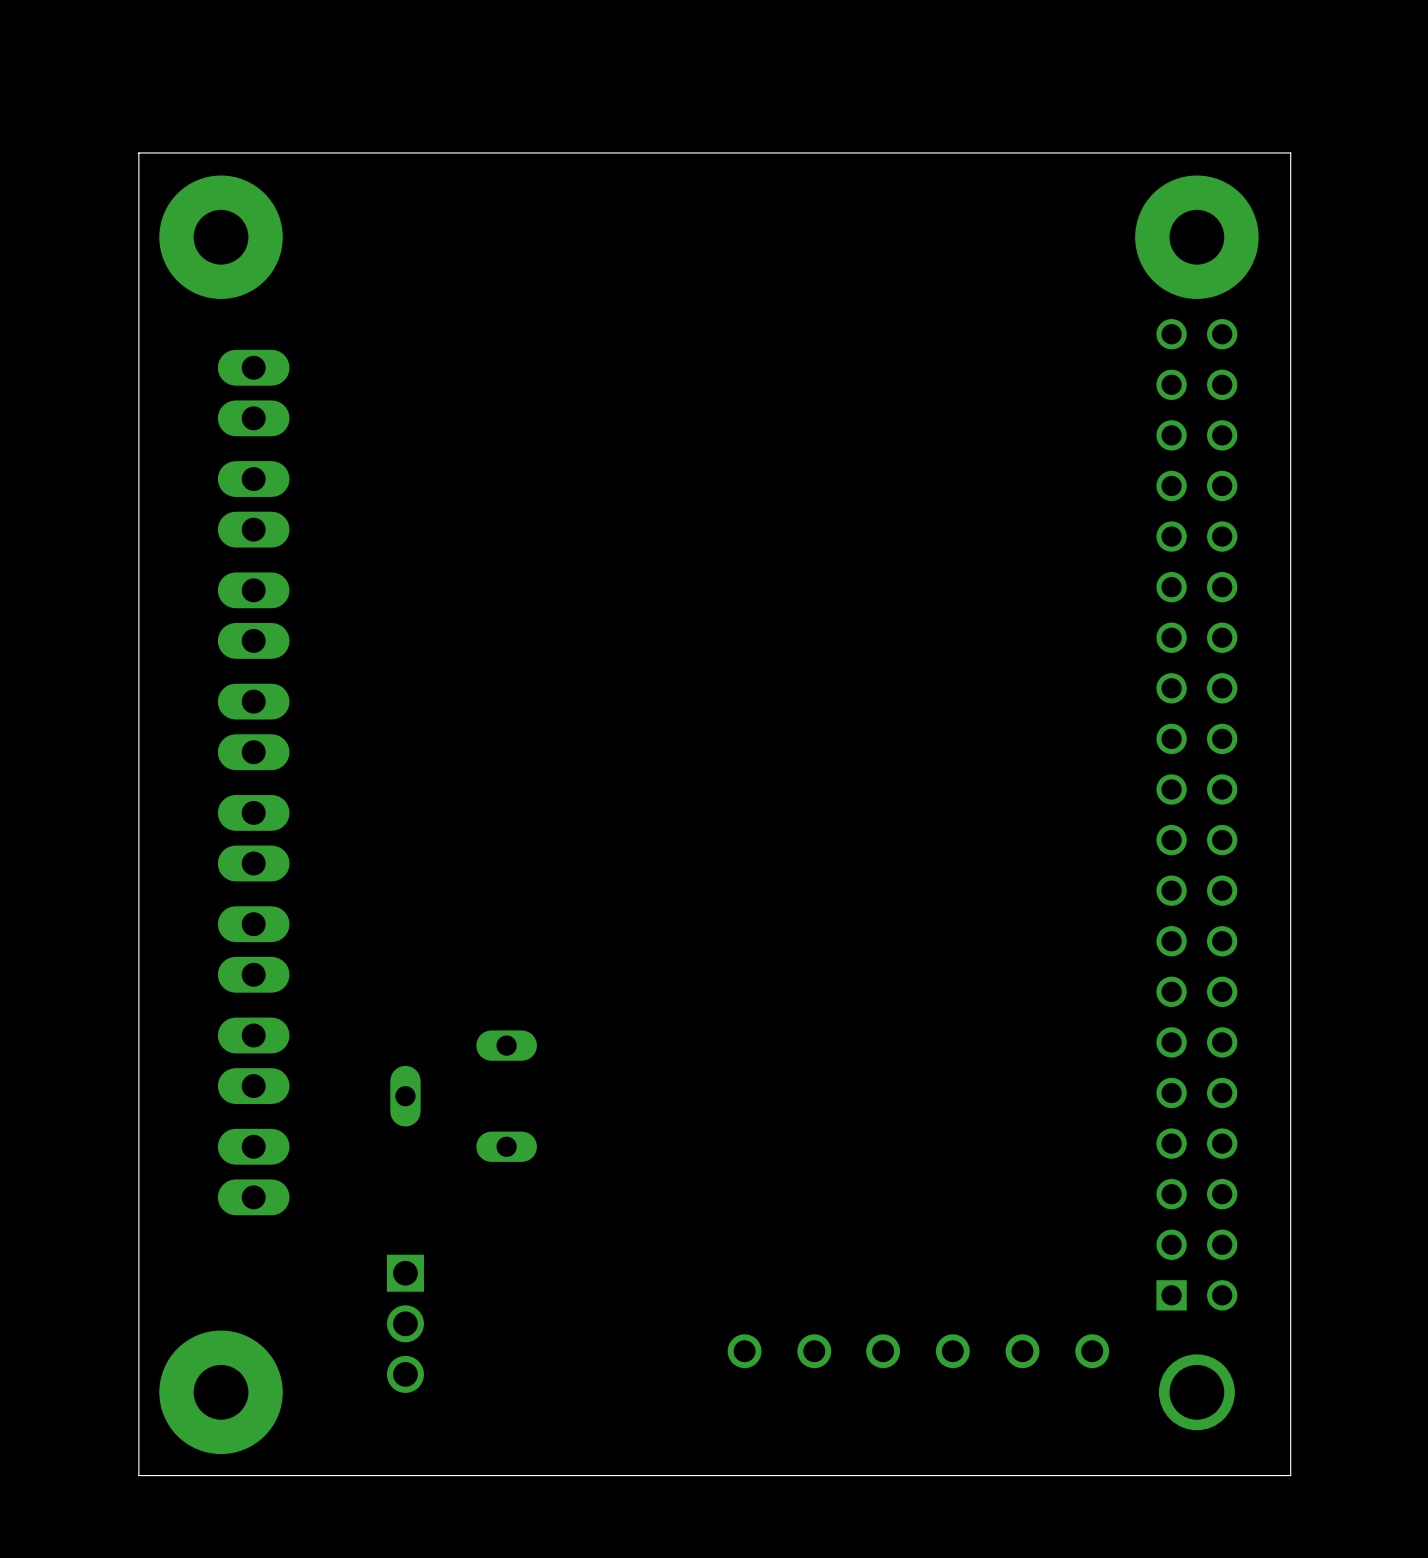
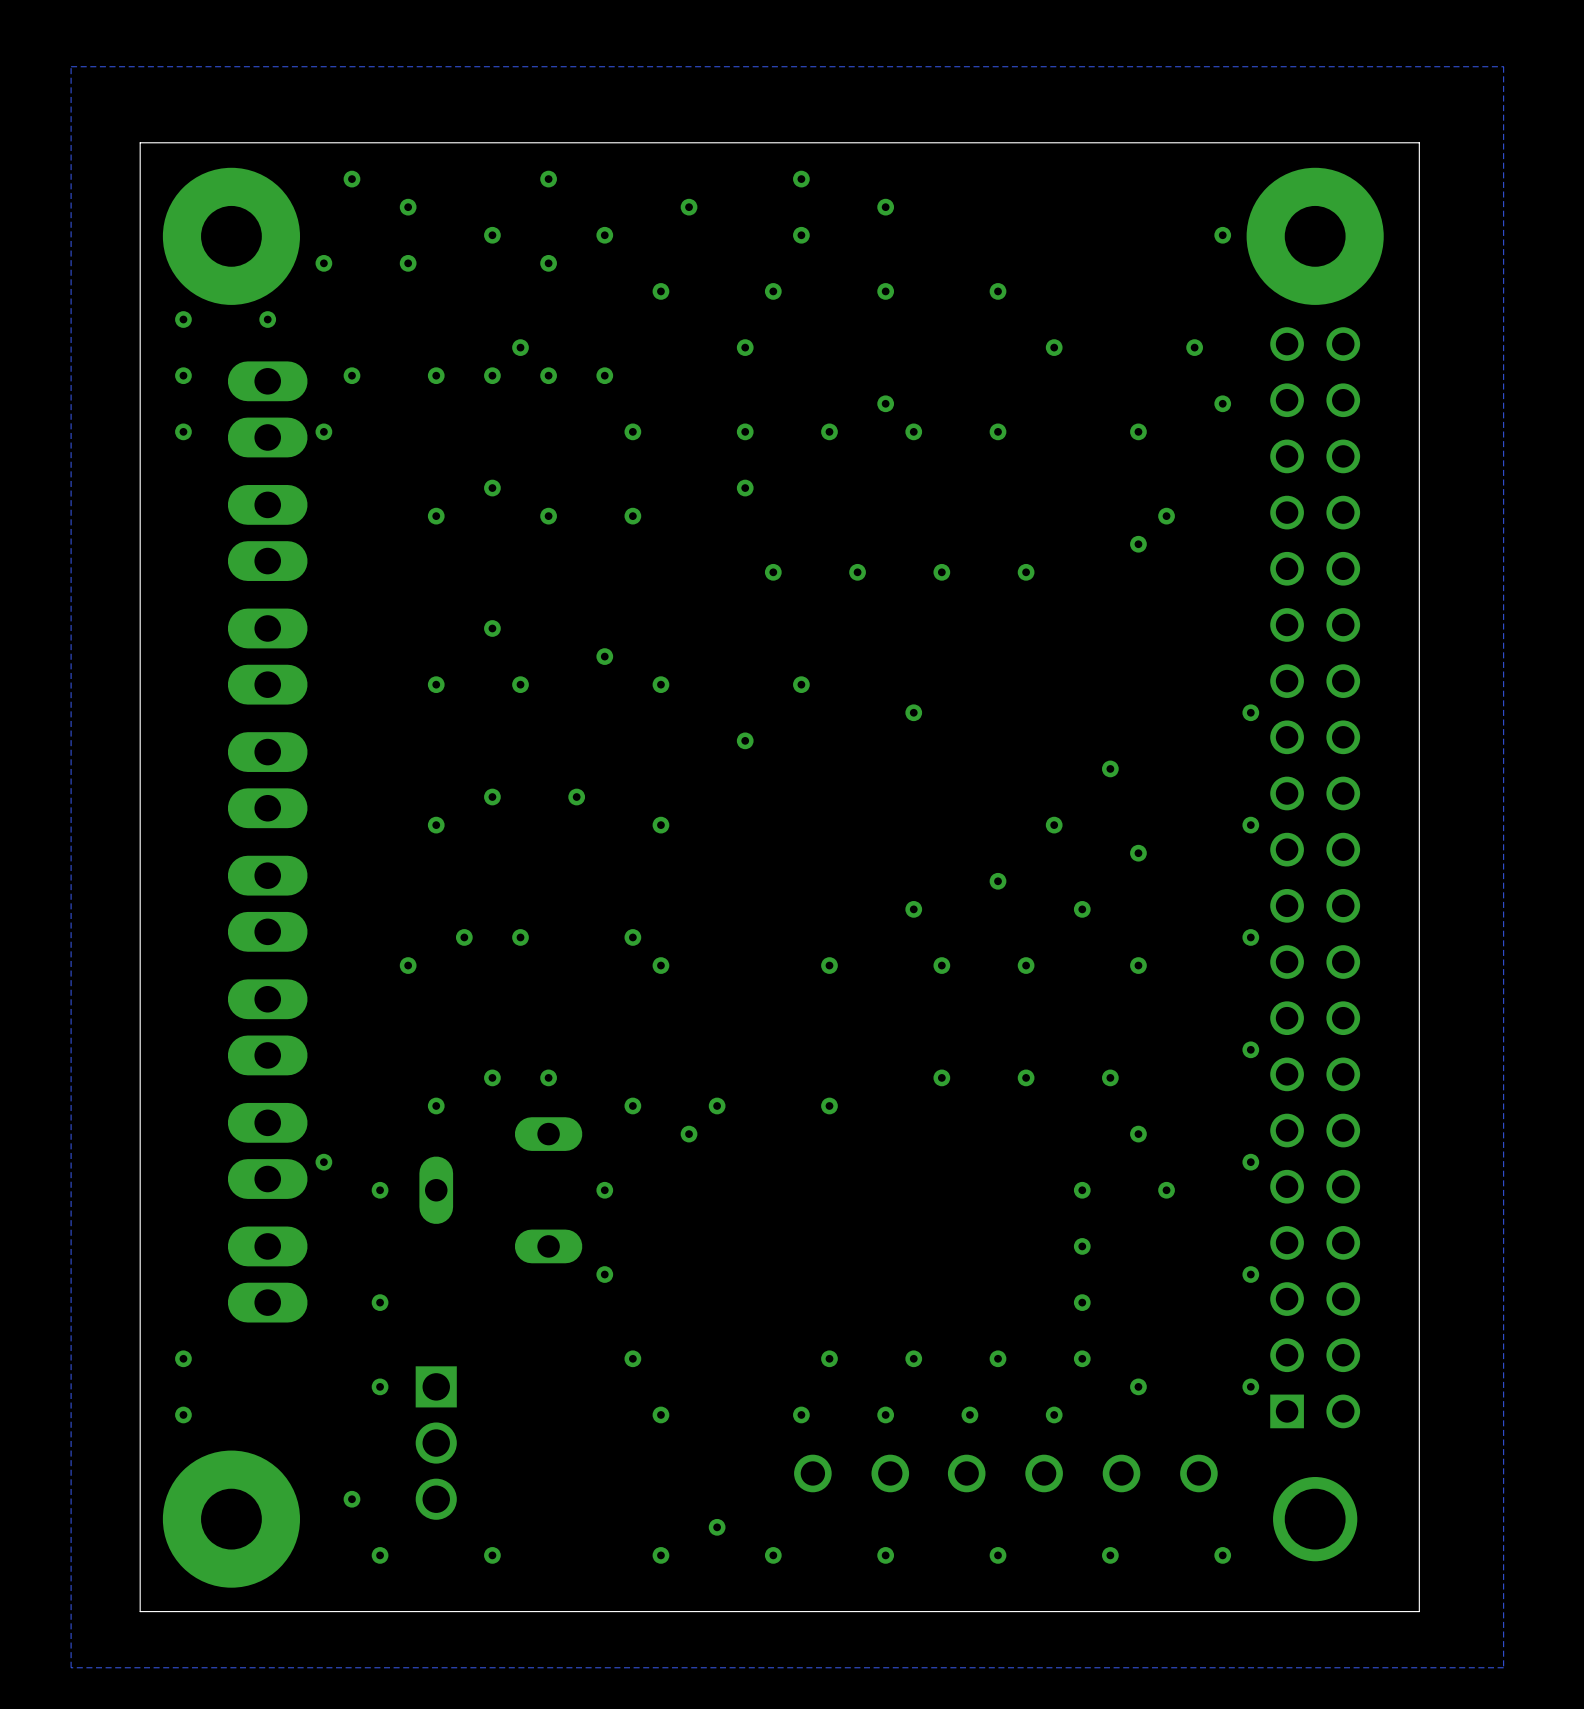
zone outline: none -> (1503, 66) (1503, 1667) (71, 1667) (71, 66) (1503, 66)
via: none -> (351, 179)
via: none -> (548, 179)
via: none -> (801, 179)
via: none -> (408, 207)
via: none -> (689, 207)
via: none -> (885, 207)
via: none -> (492, 235)
via: none -> (604, 235)
via: none -> (801, 235)
via: none -> (1222, 235)
via: none -> (323, 263)
via: none -> (408, 263)
via: none -> (548, 263)
via: none -> (660, 291)
via: none -> (773, 291)
via: none -> (885, 291)
via: none -> (998, 291)
via: none -> (183, 319)
via: none -> (267, 319)
via: none -> (520, 347)
via: none -> (745, 347)
via: none -> (1054, 347)
via: none -> (1194, 347)
via: none -> (183, 375)
via: none -> (351, 375)
via: none -> (436, 375)
via: none -> (492, 375)
via: none -> (548, 375)
via: none -> (604, 375)
via: none -> (885, 403)
via: none -> (1222, 403)
via: none -> (183, 431)
via: none -> (323, 431)
via: none -> (632, 431)
via: none -> (745, 431)
via: none -> (829, 431)
via: none -> (913, 431)
via: none -> (998, 431)
via: none -> (1138, 431)
via: none -> (492, 488)
via: none -> (745, 488)
via: none -> (436, 516)
via: none -> (548, 516)
via: none -> (632, 516)
via: none -> (1166, 516)
via: none -> (1138, 544)
via: none -> (773, 572)
via: none -> (857, 572)
via: none -> (941, 572)
via: none -> (1026, 572)
via: none -> (492, 628)
via: none -> (604, 656)
via: none -> (436, 684)
via: none -> (520, 684)
via: none -> (660, 684)
via: none -> (801, 684)
via: none -> (913, 712)
via: none -> (1250, 712)
via: none -> (745, 740)
via: none -> (1110, 768)
via: none -> (492, 797)
via: none -> (576, 797)
via: none -> (436, 825)
via: none -> (660, 825)
via: none -> (1054, 825)
via: none -> (1250, 825)
via: none -> (1138, 853)
via: none -> (998, 881)
via: none -> (913, 909)
via: none -> (1082, 909)
via: none -> (464, 937)
via: none -> (520, 937)
via: none -> (632, 937)
via: none -> (1250, 937)
via: none -> (408, 965)
via: none -> (660, 965)
via: none -> (829, 965)
via: none -> (941, 965)
via: none -> (1026, 965)
via: none -> (1138, 965)
via: none -> (1250, 1049)
via: none -> (492, 1077)
via: none -> (548, 1077)
via: none -> (941, 1077)
via: none -> (1026, 1077)
via: none -> (1110, 1077)
via: none -> (436, 1105)
via: none -> (632, 1105)
via: none -> (717, 1105)
via: none -> (829, 1105)
via: none -> (689, 1134)
via: none -> (1138, 1134)
via: none -> (323, 1162)
via: none -> (1250, 1162)
via: none -> (380, 1190)
via: none -> (604, 1190)
via: none -> (1082, 1190)
via: none -> (1166, 1190)
via: none -> (1082, 1246)
via: none -> (604, 1274)
via: none -> (1250, 1274)
via: none -> (380, 1302)
via: none -> (1082, 1302)
via: none -> (183, 1358)
via: none -> (632, 1358)
via: none -> (829, 1358)
via: none -> (913, 1358)
via: none -> (998, 1358)
via: none -> (1082, 1358)
via: none -> (380, 1386)
via: none -> (1138, 1386)
via: none -> (1250, 1386)
via: none -> (183, 1414)
via: none -> (660, 1414)
via: none -> (801, 1414)
via: none -> (885, 1414)
via: none -> (969, 1414)
via: none -> (1054, 1414)
via: none -> (351, 1499)
via: none -> (717, 1527)
via: none -> (380, 1555)
via: none -> (492, 1555)
via: none -> (660, 1555)
via: none -> (773, 1555)
via: none -> (885, 1555)
via: none -> (998, 1555)
via: none -> (1110, 1555)
via: none -> (1222, 1555)

